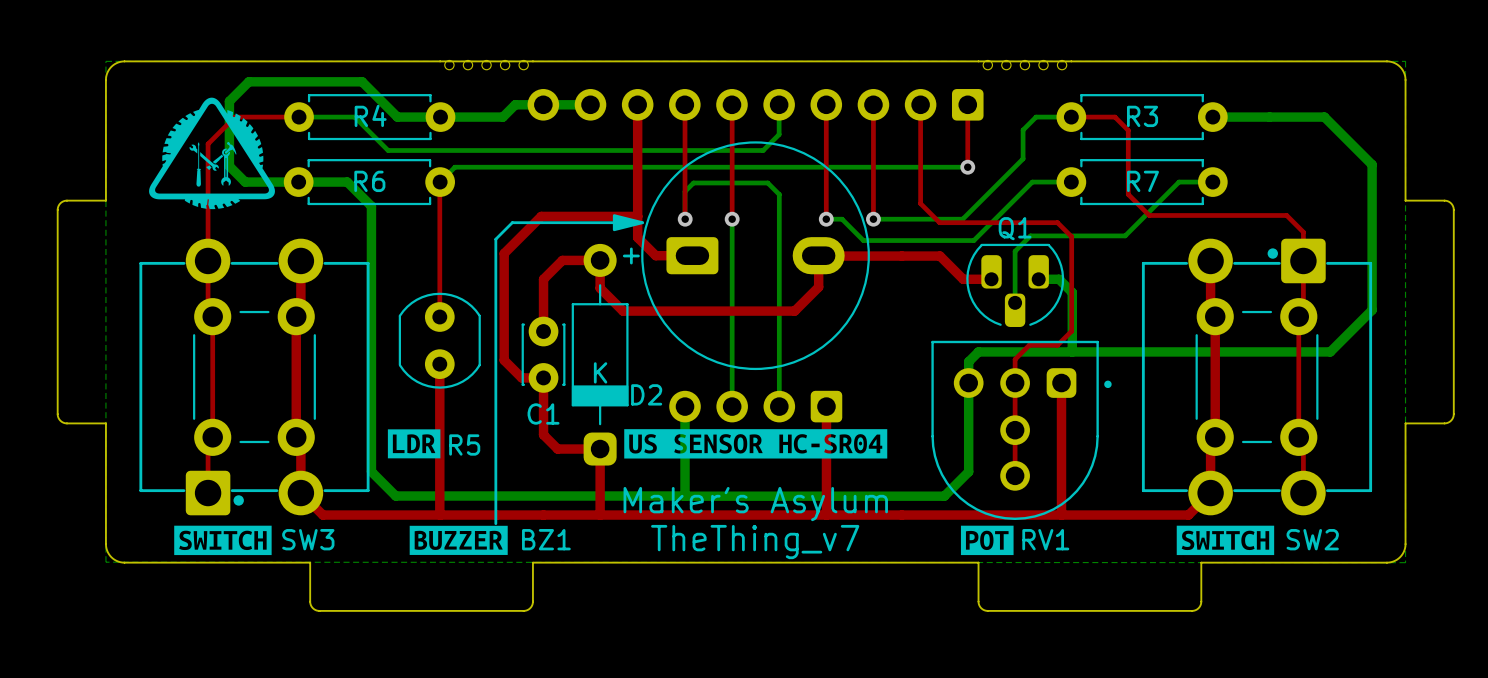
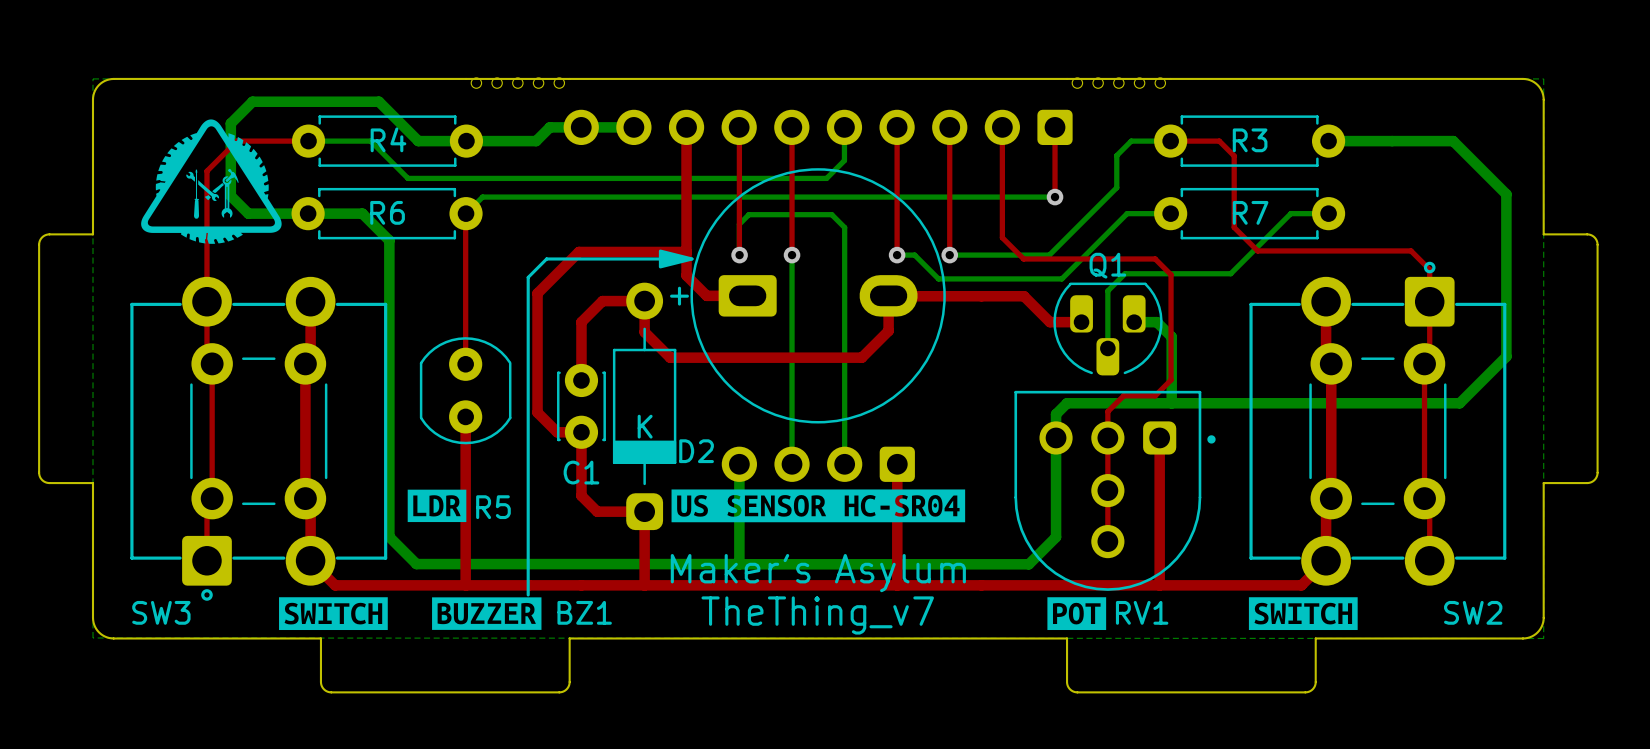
SW3 footprint: [139, 238, 370, 516] -> [130, 276, 388, 601]
SW2 footprint: [1141, 238, 1373, 516] -> [1249, 261, 1507, 586]
SW3 name position: SW3 (308, 539) -> SW3 (161, 612)
drawing position: (222, 540) -> (333, 613)
drawing position: (1225, 540) -> (1303, 613)

